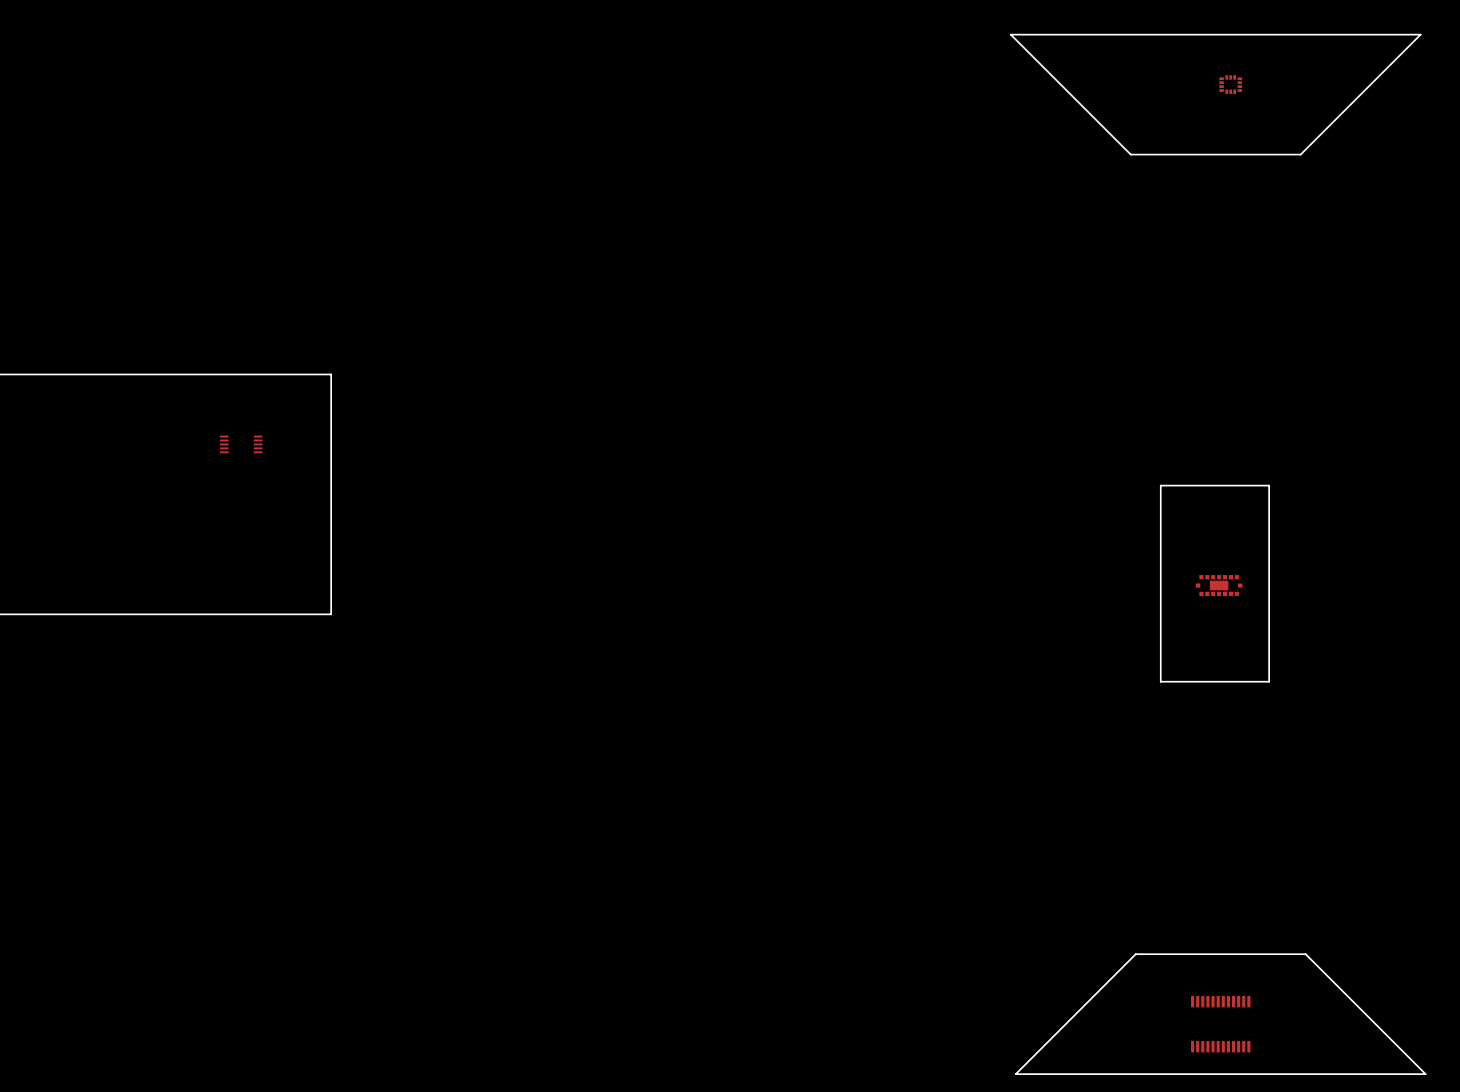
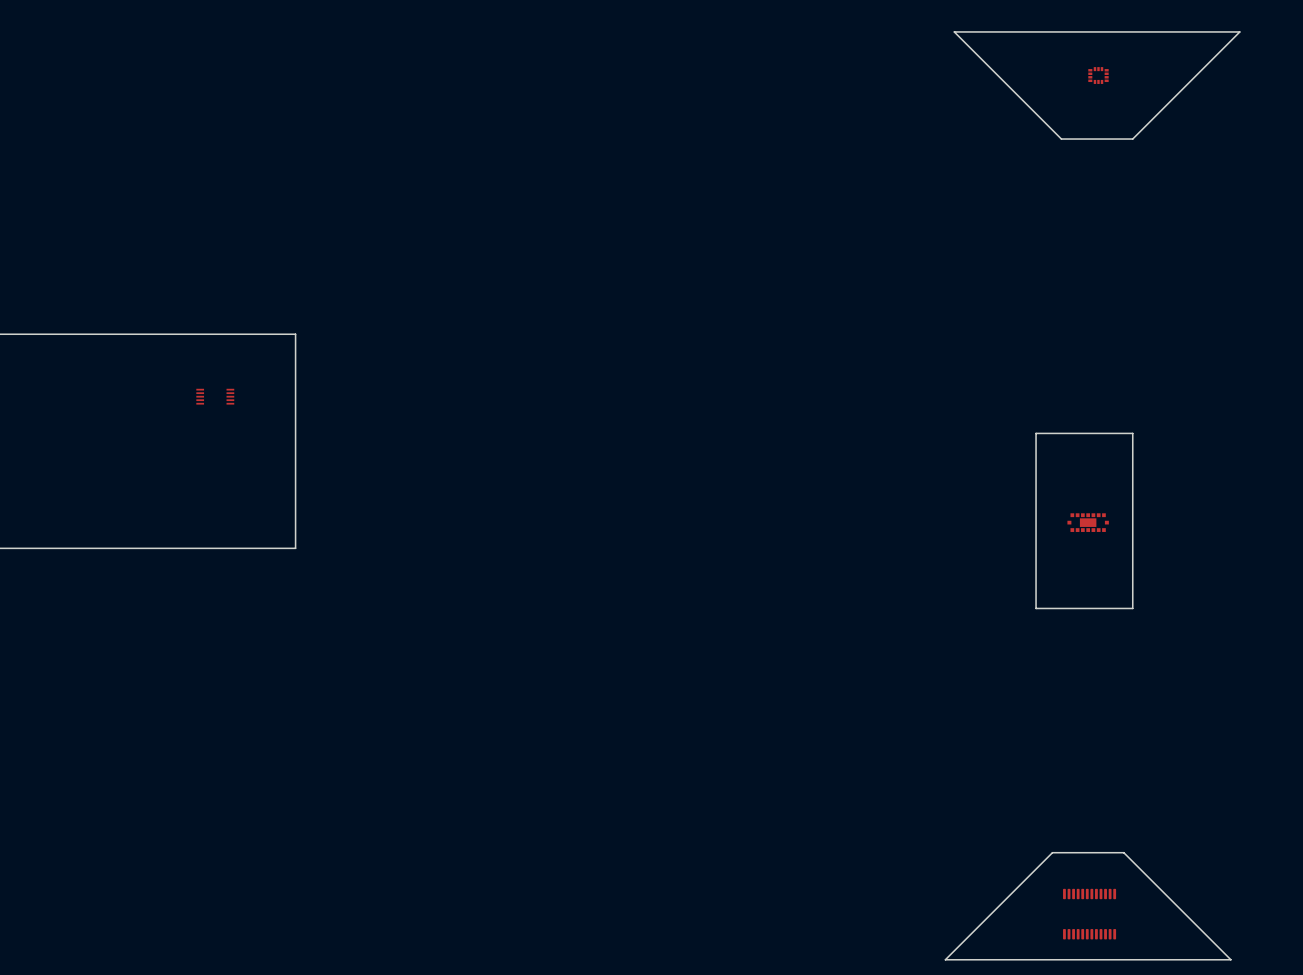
board edge: (1420, 34) (1010, 34) (1130, 154) (1300, 154) (1420, 34) -> (1239, 31) (1132, 139) (1061, 139) (954, 31) (1239, 31)
board edge: (1305, 954) (1135, 954) (1015, 1074) (1425, 1074) (1305, 954) -> (1123, 852) (1230, 959) (945, 959) (1052, 852) (1123, 852)

